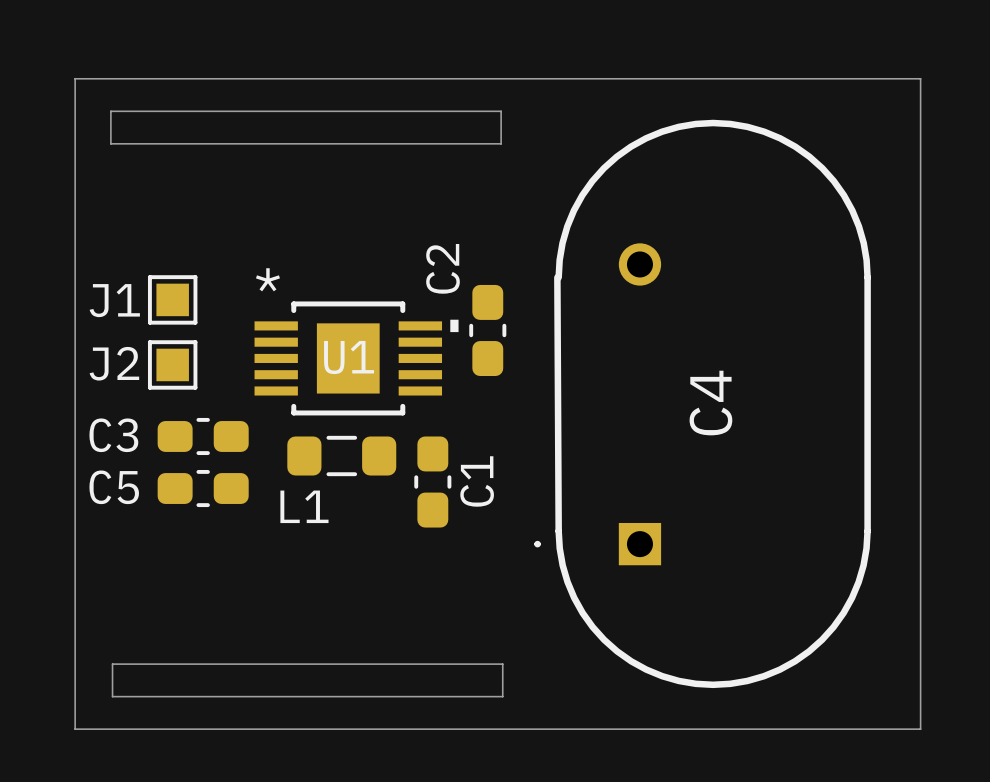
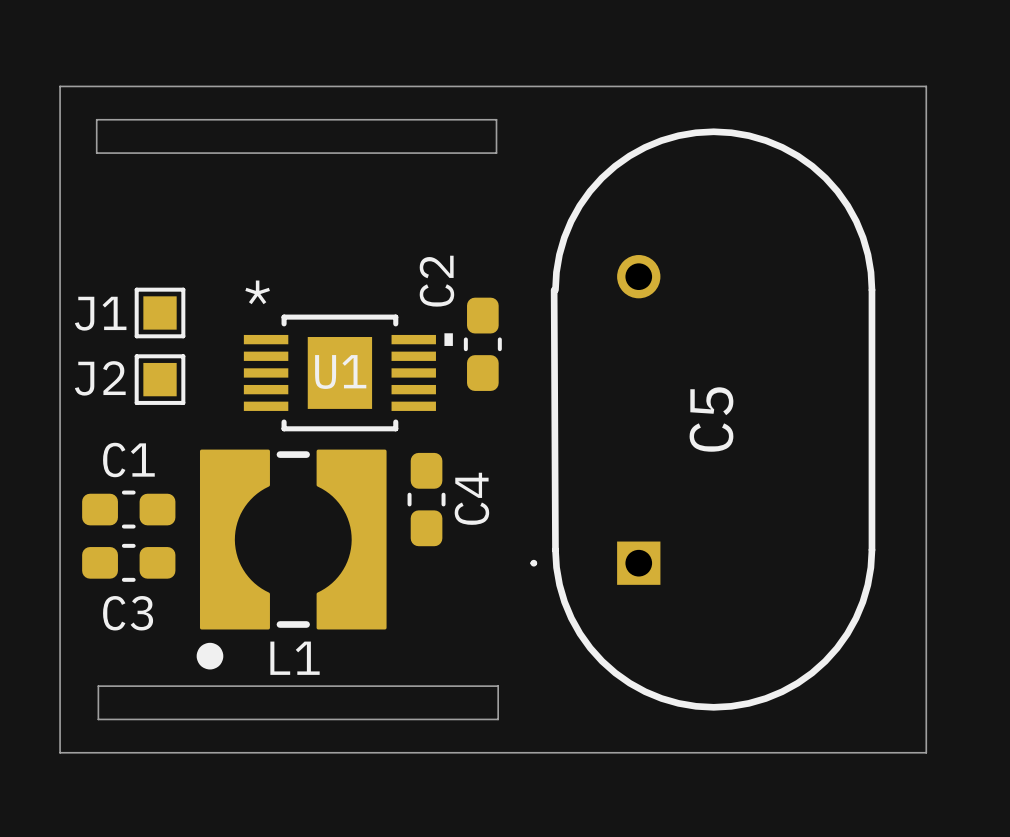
C4 name: C4 (710, 403) -> C5 (711, 419)
C3 name position: C3 (113, 435) -> C3 (128, 613)
L1 footprint: [287, 435, 397, 477] -> [196, 449, 387, 670]
C3 position: (203, 436) -> (128, 562)
C1 name: C1 (477, 481) -> C4 (471, 498)
C5: (203, 488) -> none
C1: none -> (128, 509)

